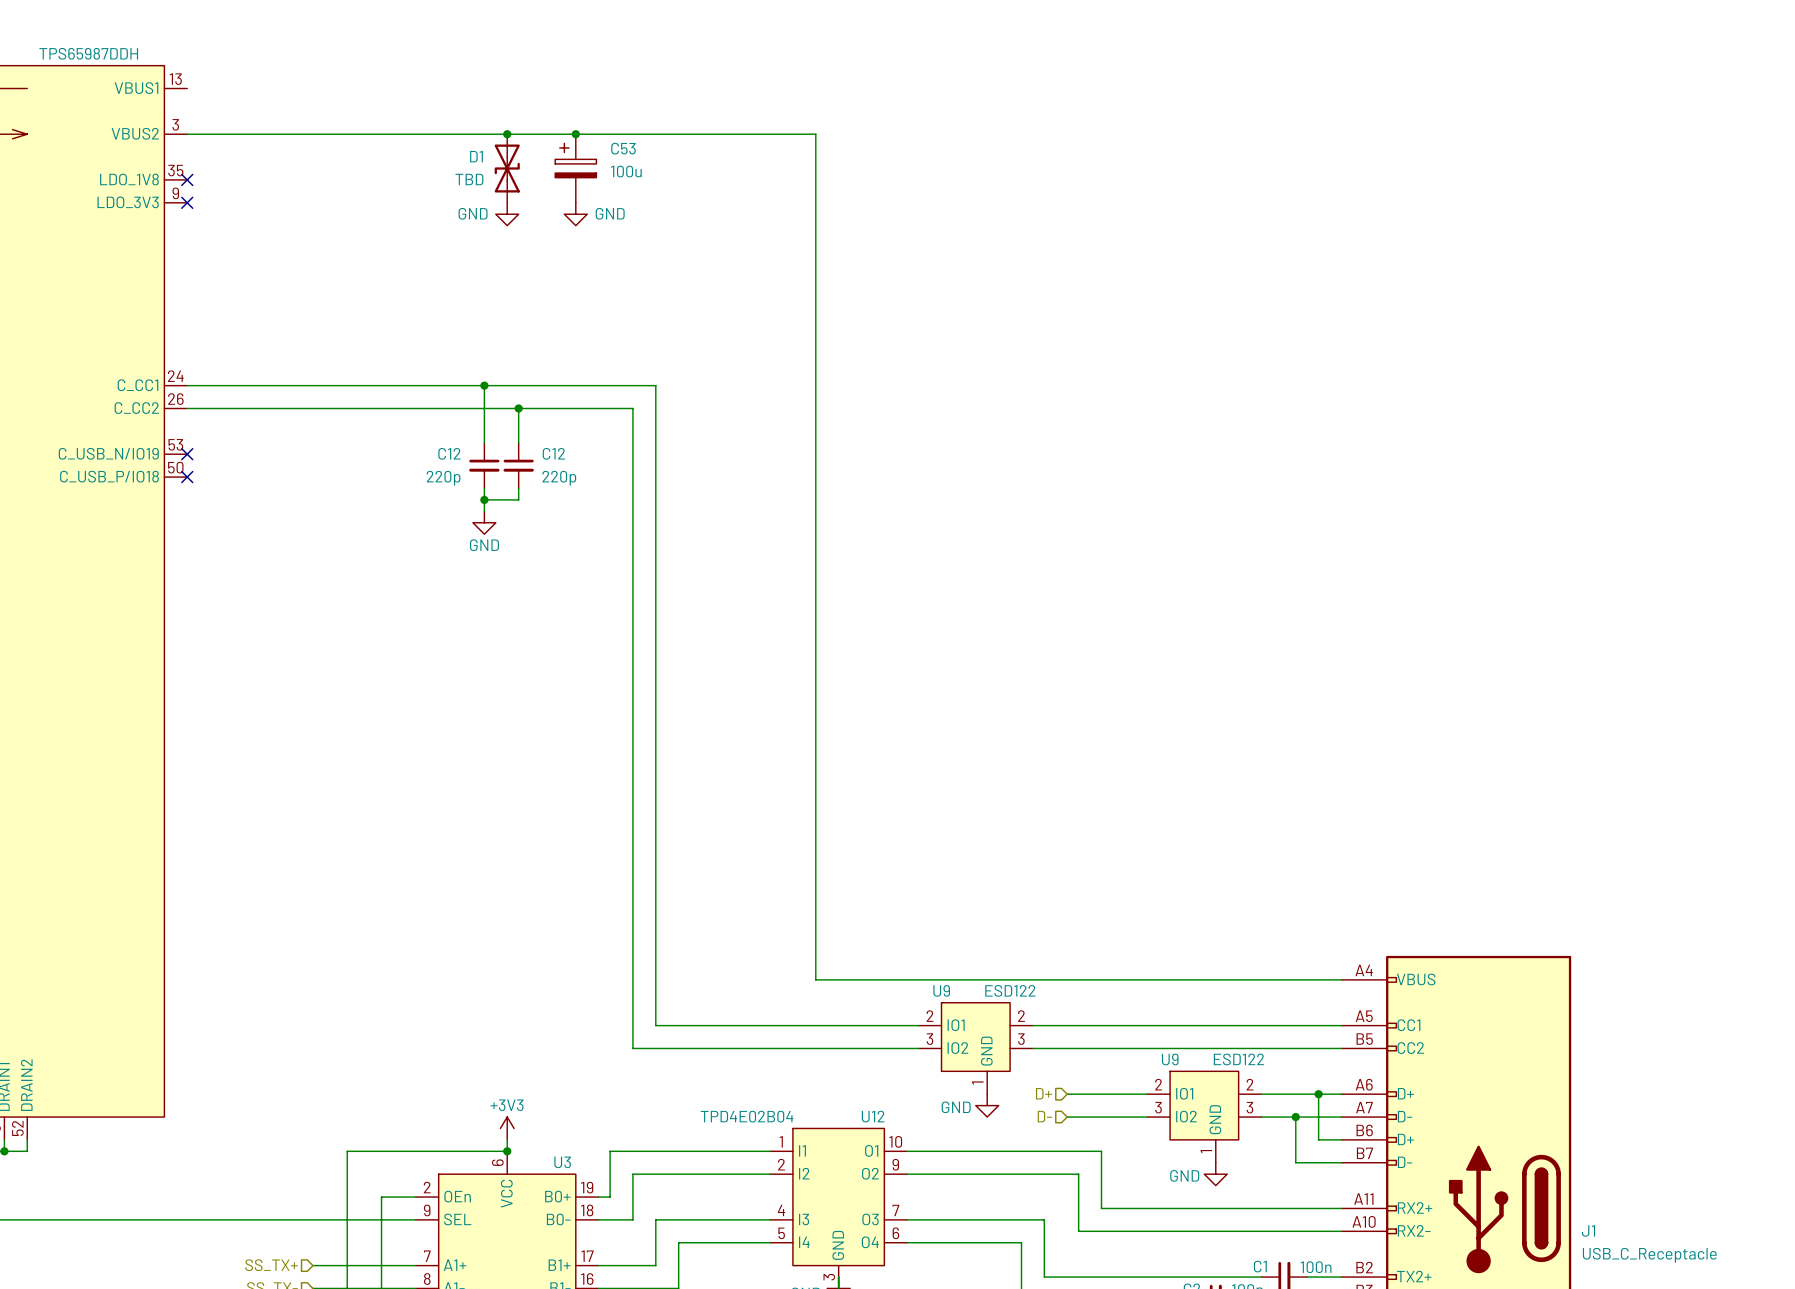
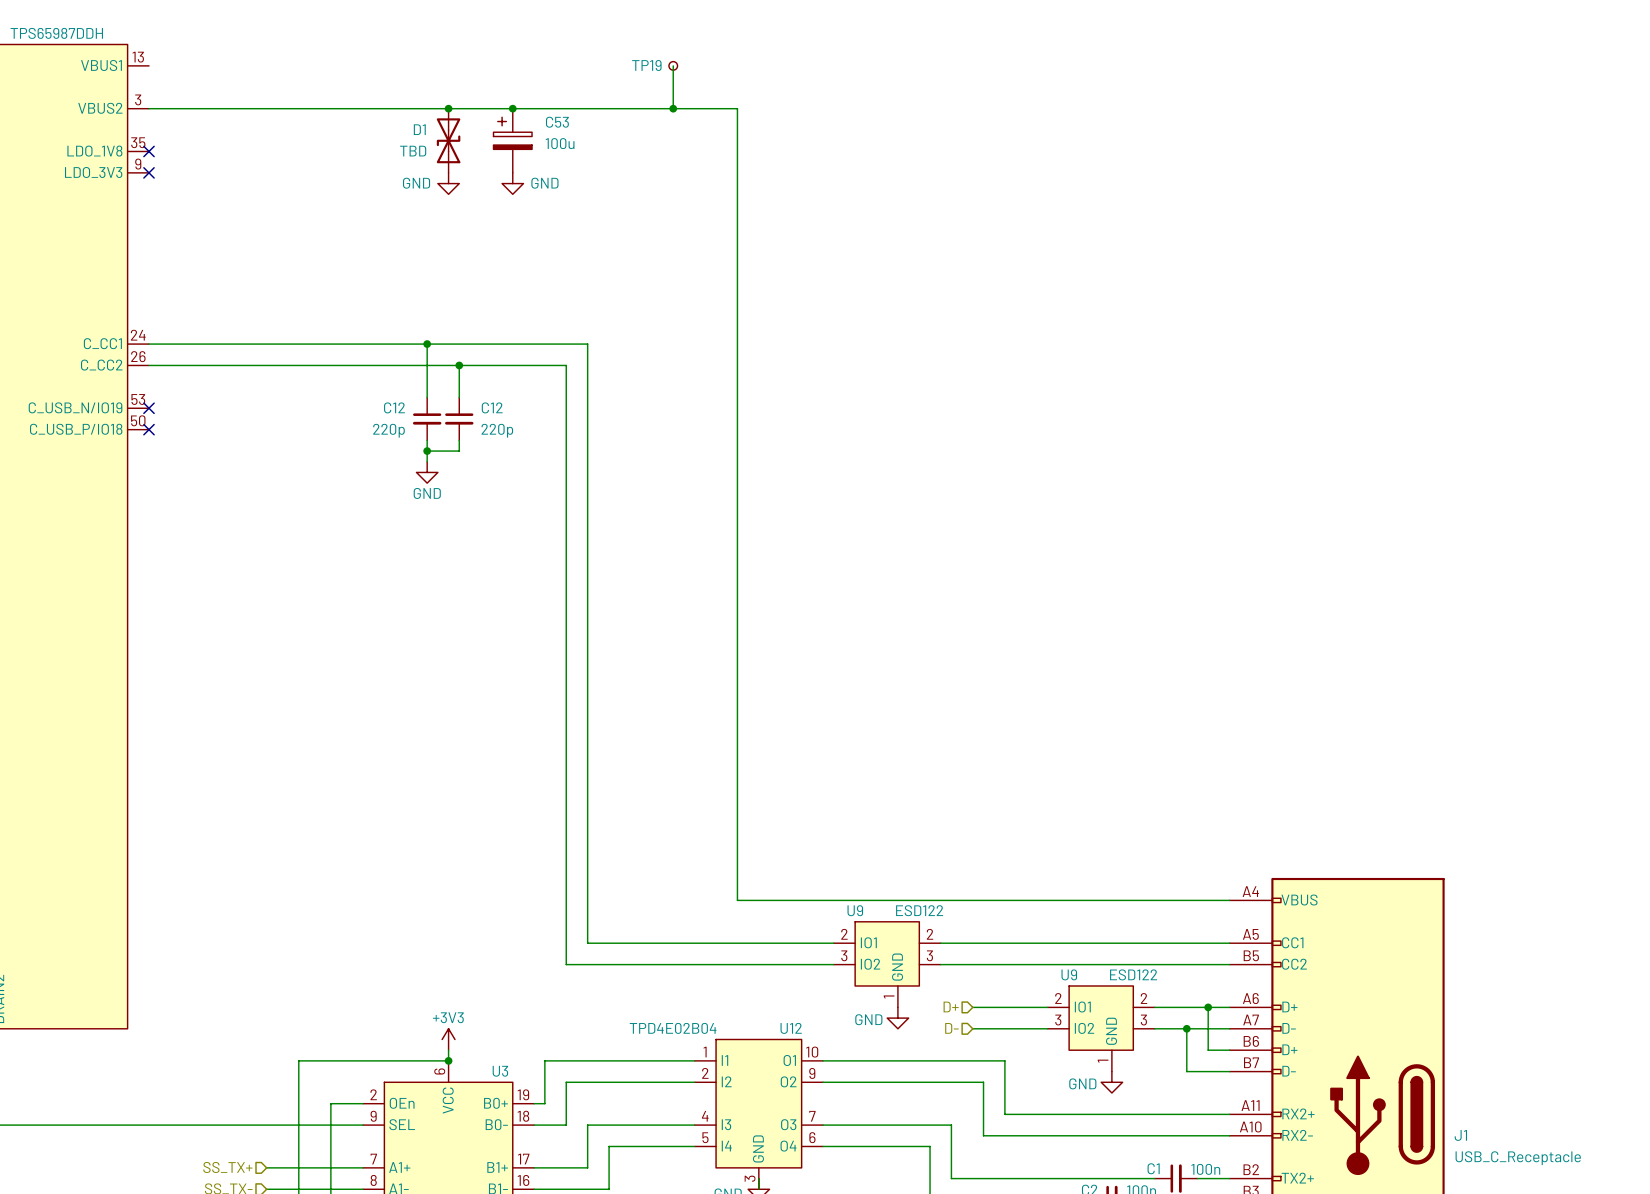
wire: none -> (673, 65) (673, 108)
TP19: none -> (673, 65)
junction: none -> (673, 108)

